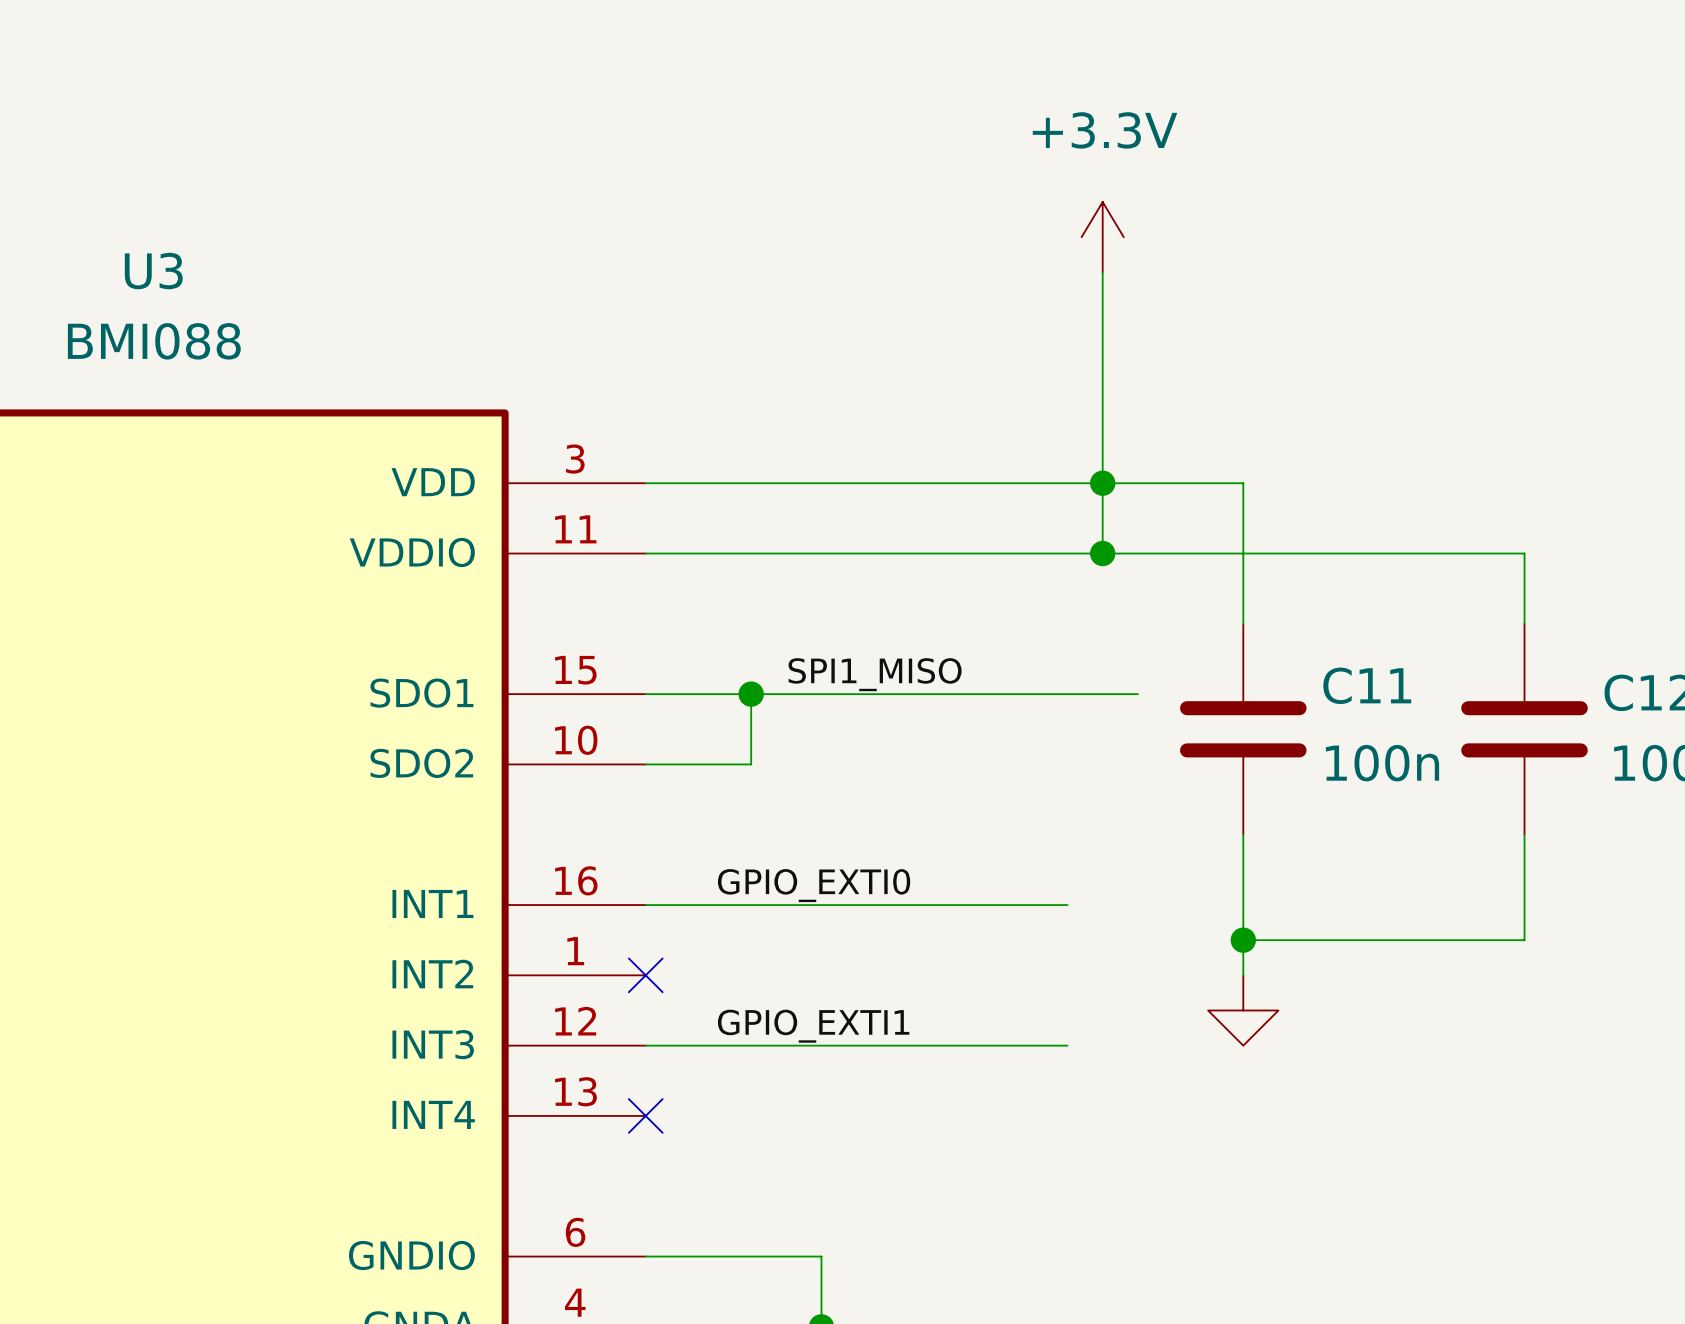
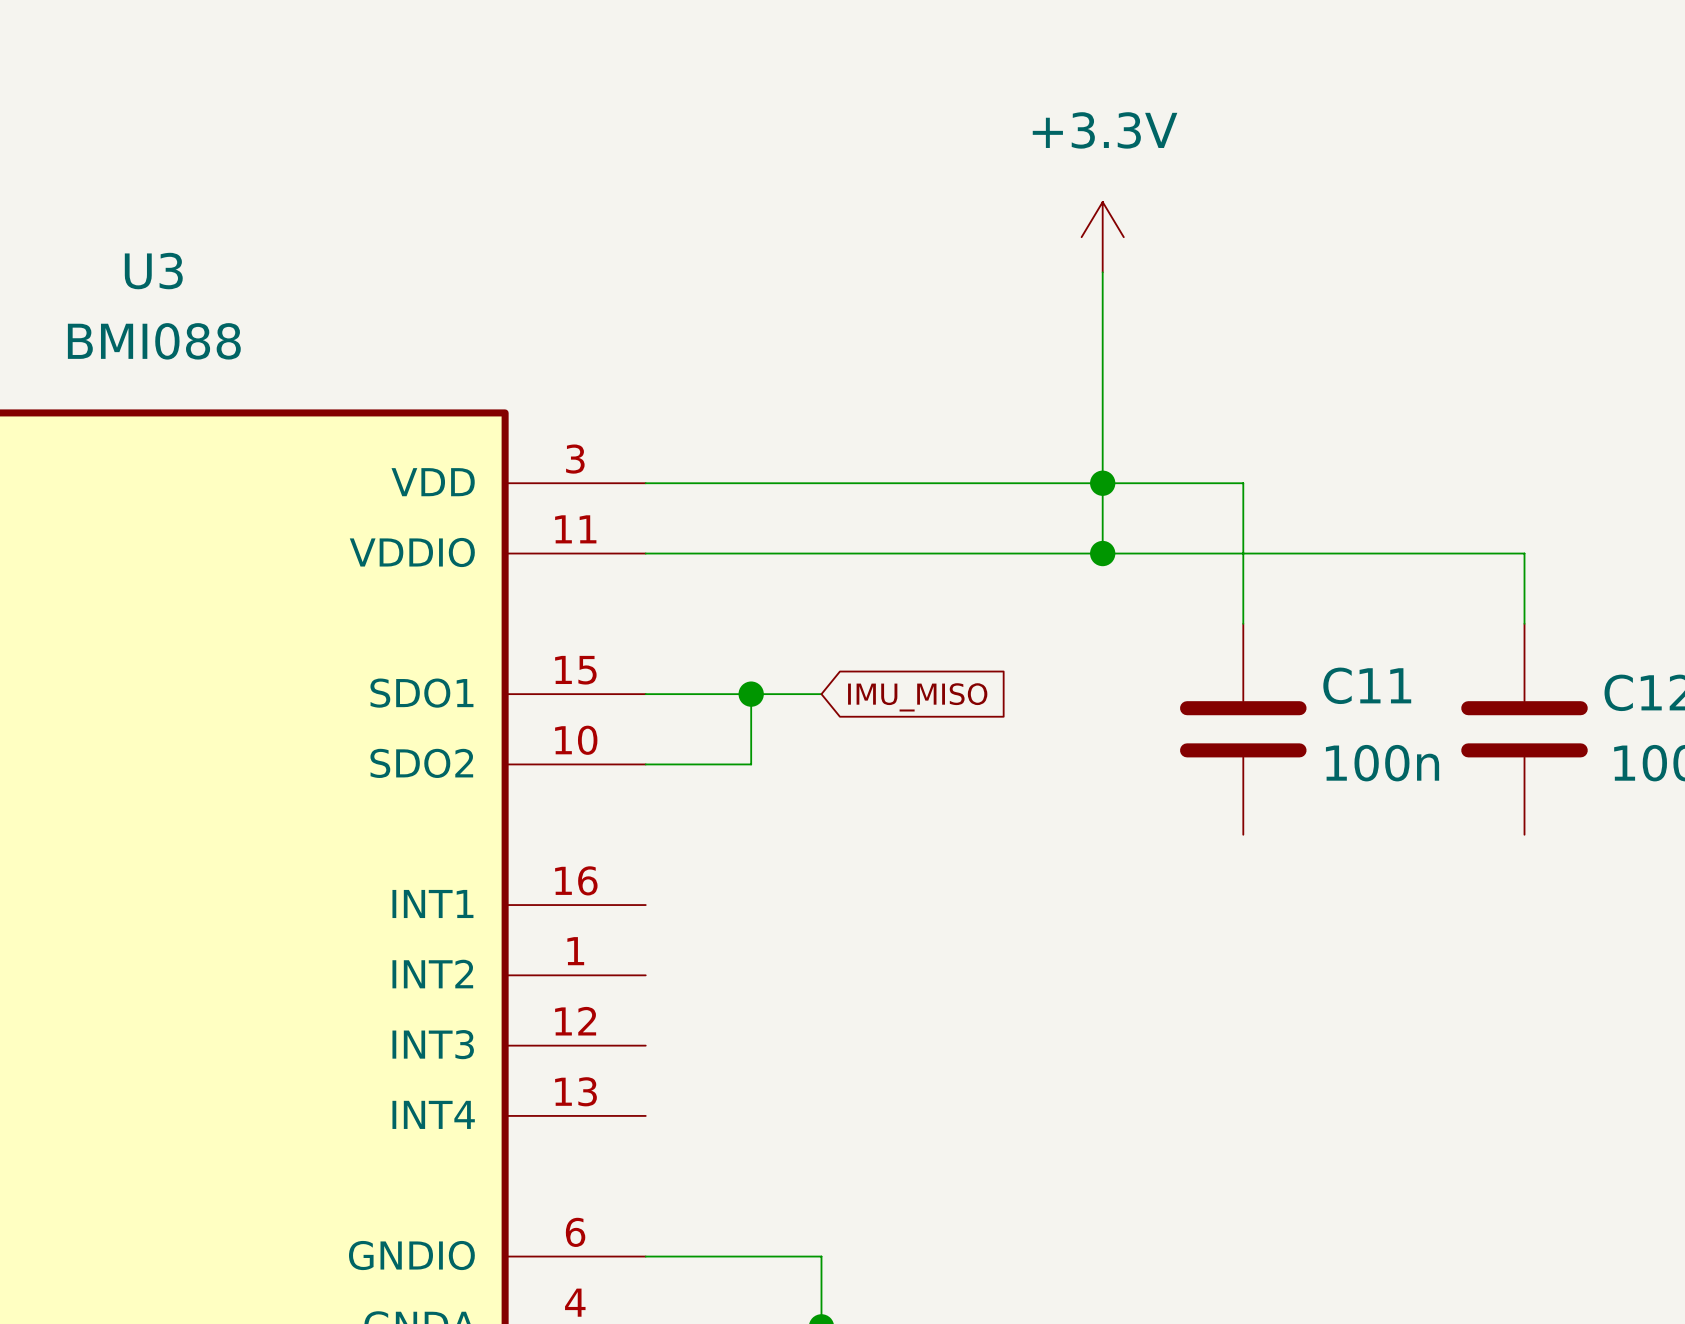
label: SPI1_MISO (875, 674) -> none
wire: (821, 694) (1137, 694) -> none
global label: none -> IMU_MISO (917, 697)
wire: (1243, 834) (1243, 975) -> none
wire: (1524, 834) (1524, 940) (1243, 940) -> none
label: GPIO_EXTI0 (814, 885) -> none
wire: (645, 905) (1067, 905) -> none
junction: (1243, 940) -> none
no-connect mark: (645, 975) -> none
power symbol: (1243, 1010) -> none
label: GPIO_EXTI1 (813, 1026) -> none
wire: (645, 1045) (1067, 1045) -> none
no-connect mark: (645, 1115) -> none

